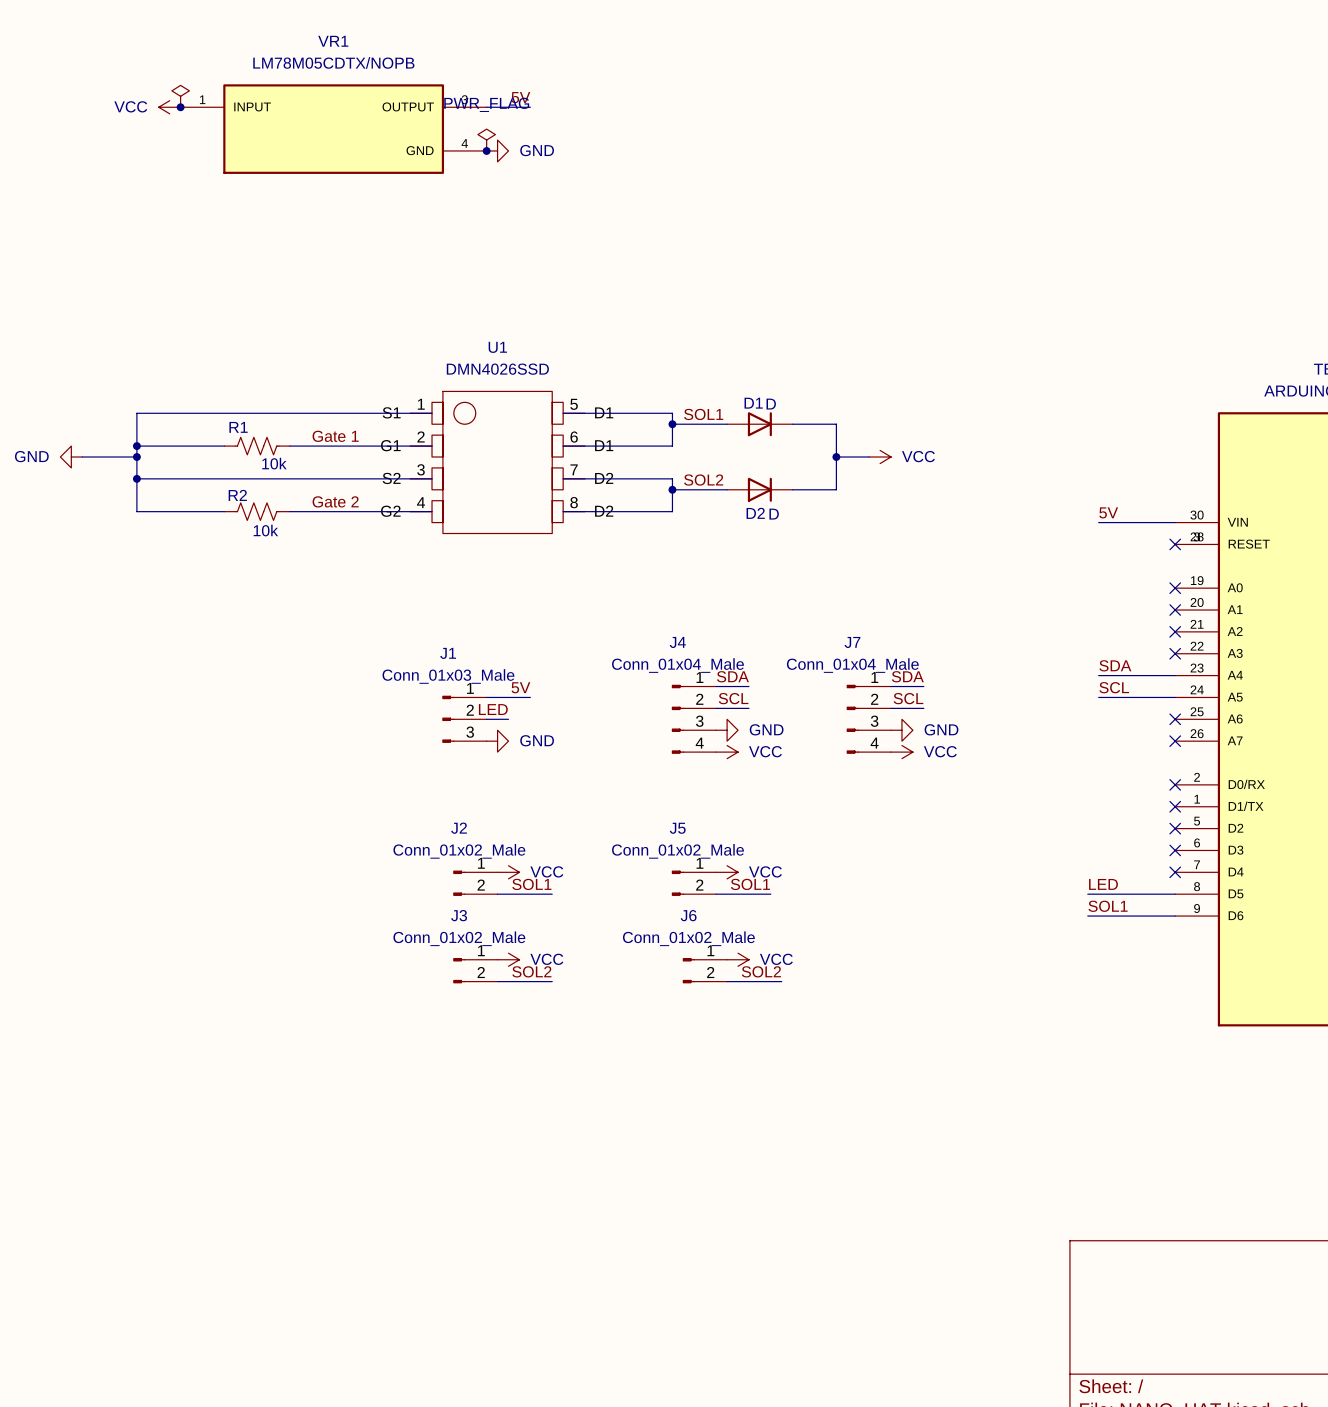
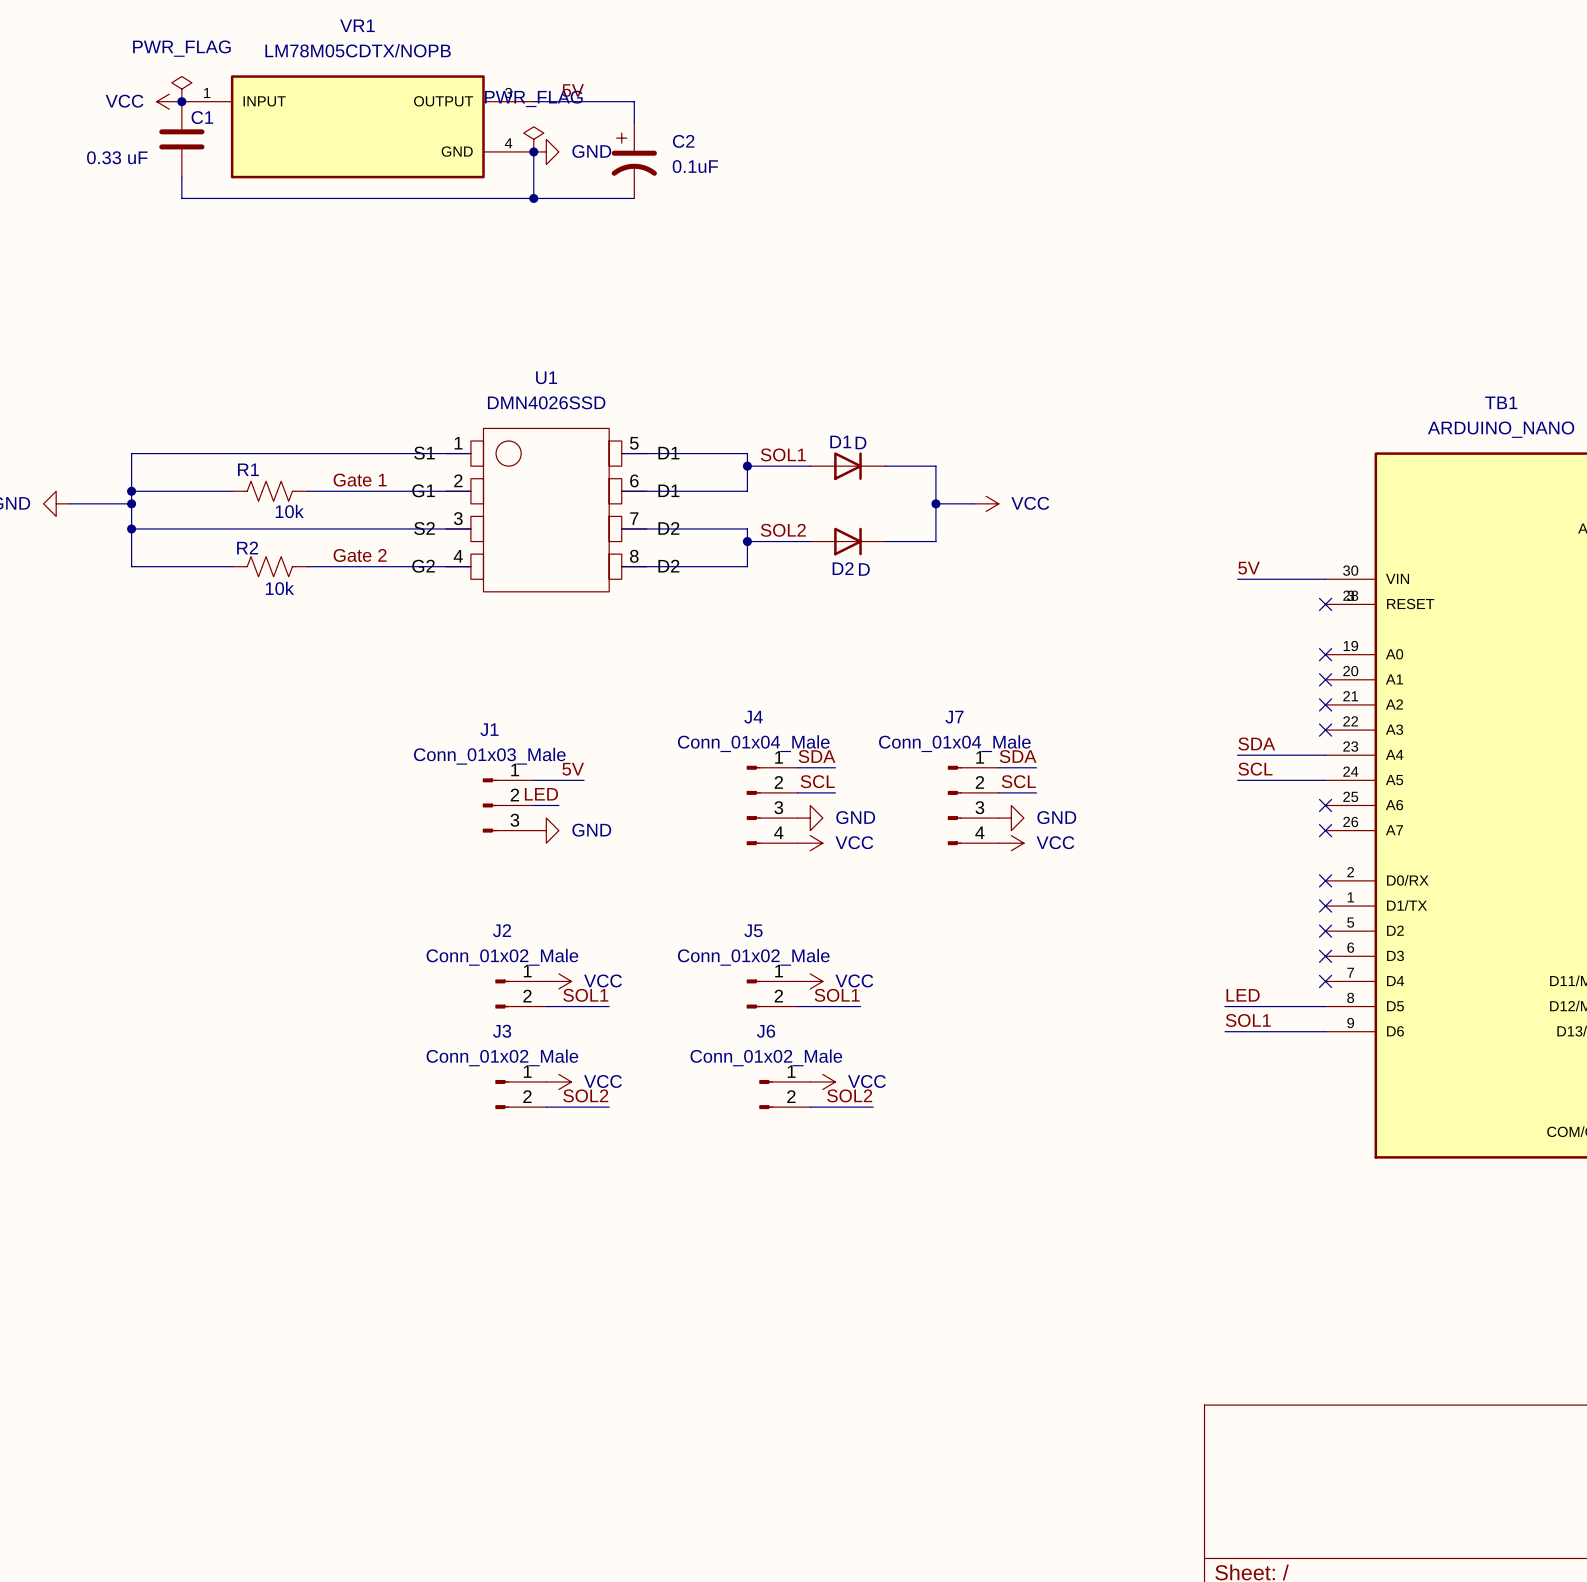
power symbol text: none -> PWR_FLAG (181, 48)
wire: none -> (584, 101) (634, 101) (634, 123)
C1: none -> 0.33 uF (181, 139)
wire: none -> (533, 151) (533, 198)
C2: none -> 0.1uF (634, 160)
wire: none -> (181, 177) (181, 198) (634, 198)
junction: none -> (533, 198)

